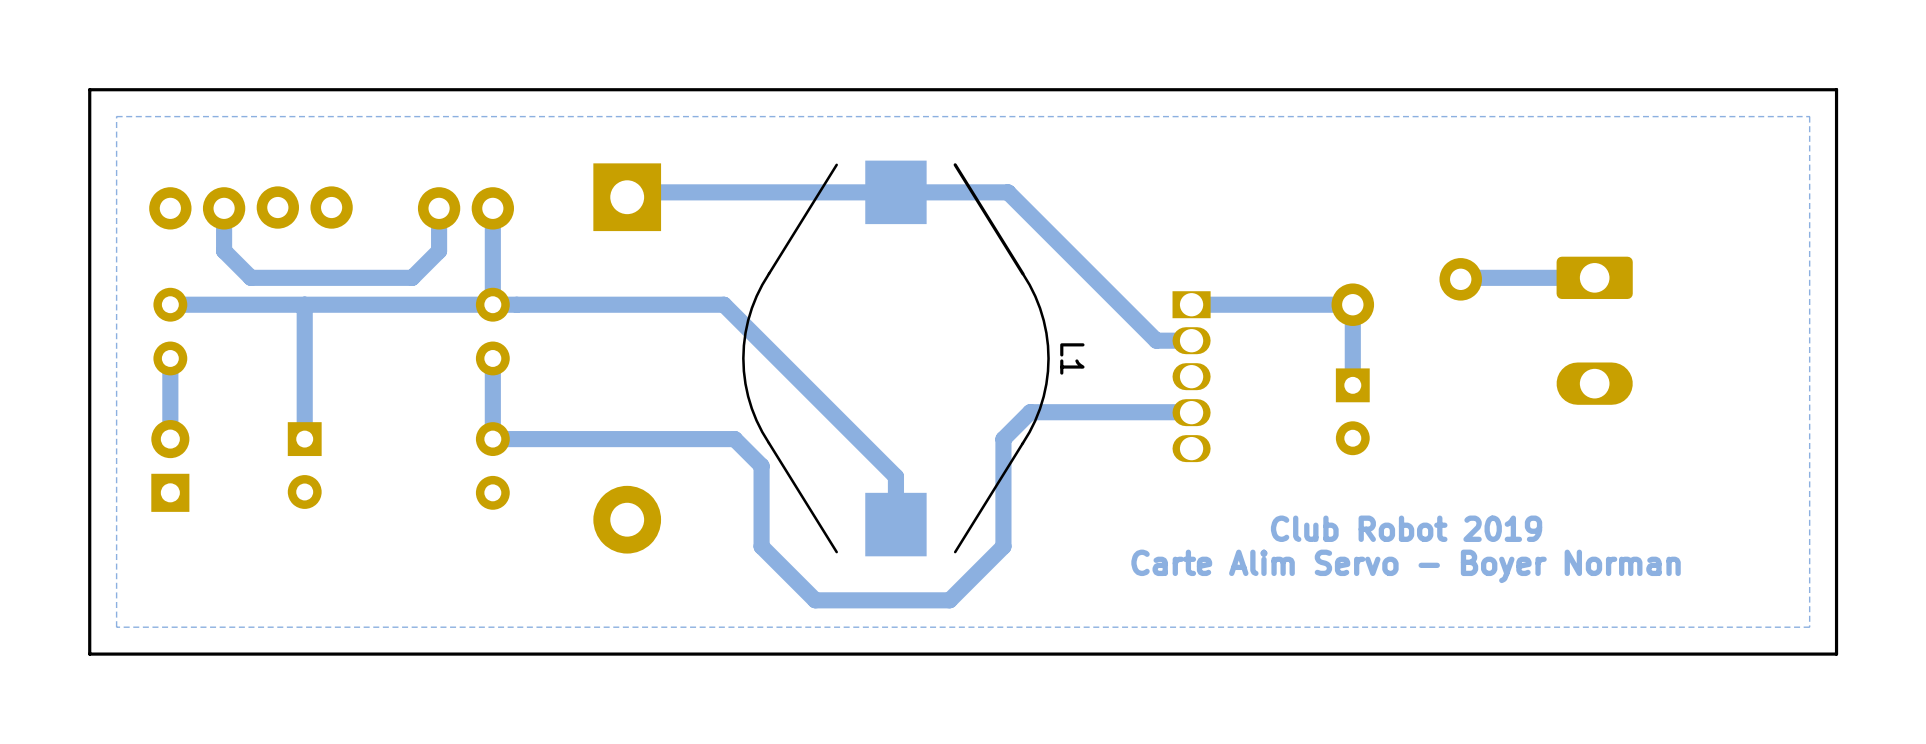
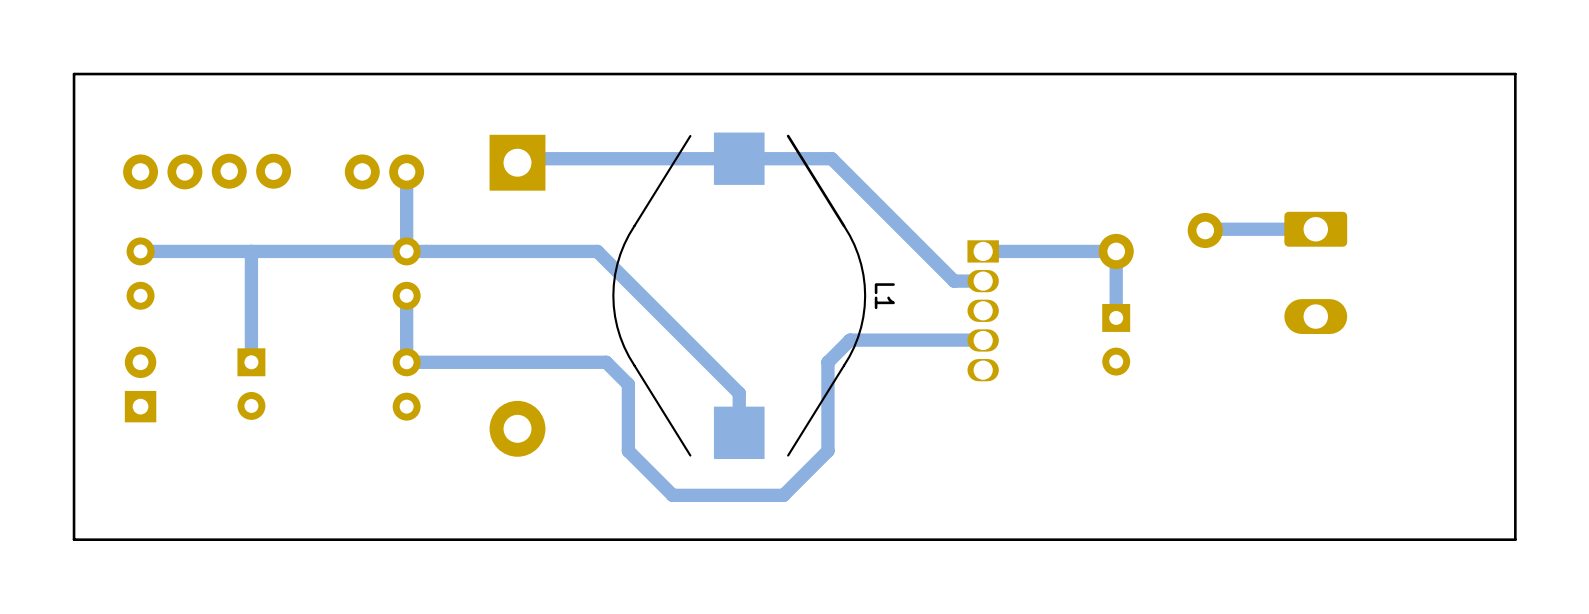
zone outline: (1809, 116) (1809, 627) (116, 627) (116, 116) (1809, 116) -> none
track: (439, 208) (439, 250) (412, 277) (250, 277) (224, 250) (224, 208) -> none
track: (170, 358) (170, 439) -> none
text: Club Robot 2019 (1406, 528) -> none
text: Carte Alim Servo - Boyer Norman (1406, 566) -> none

